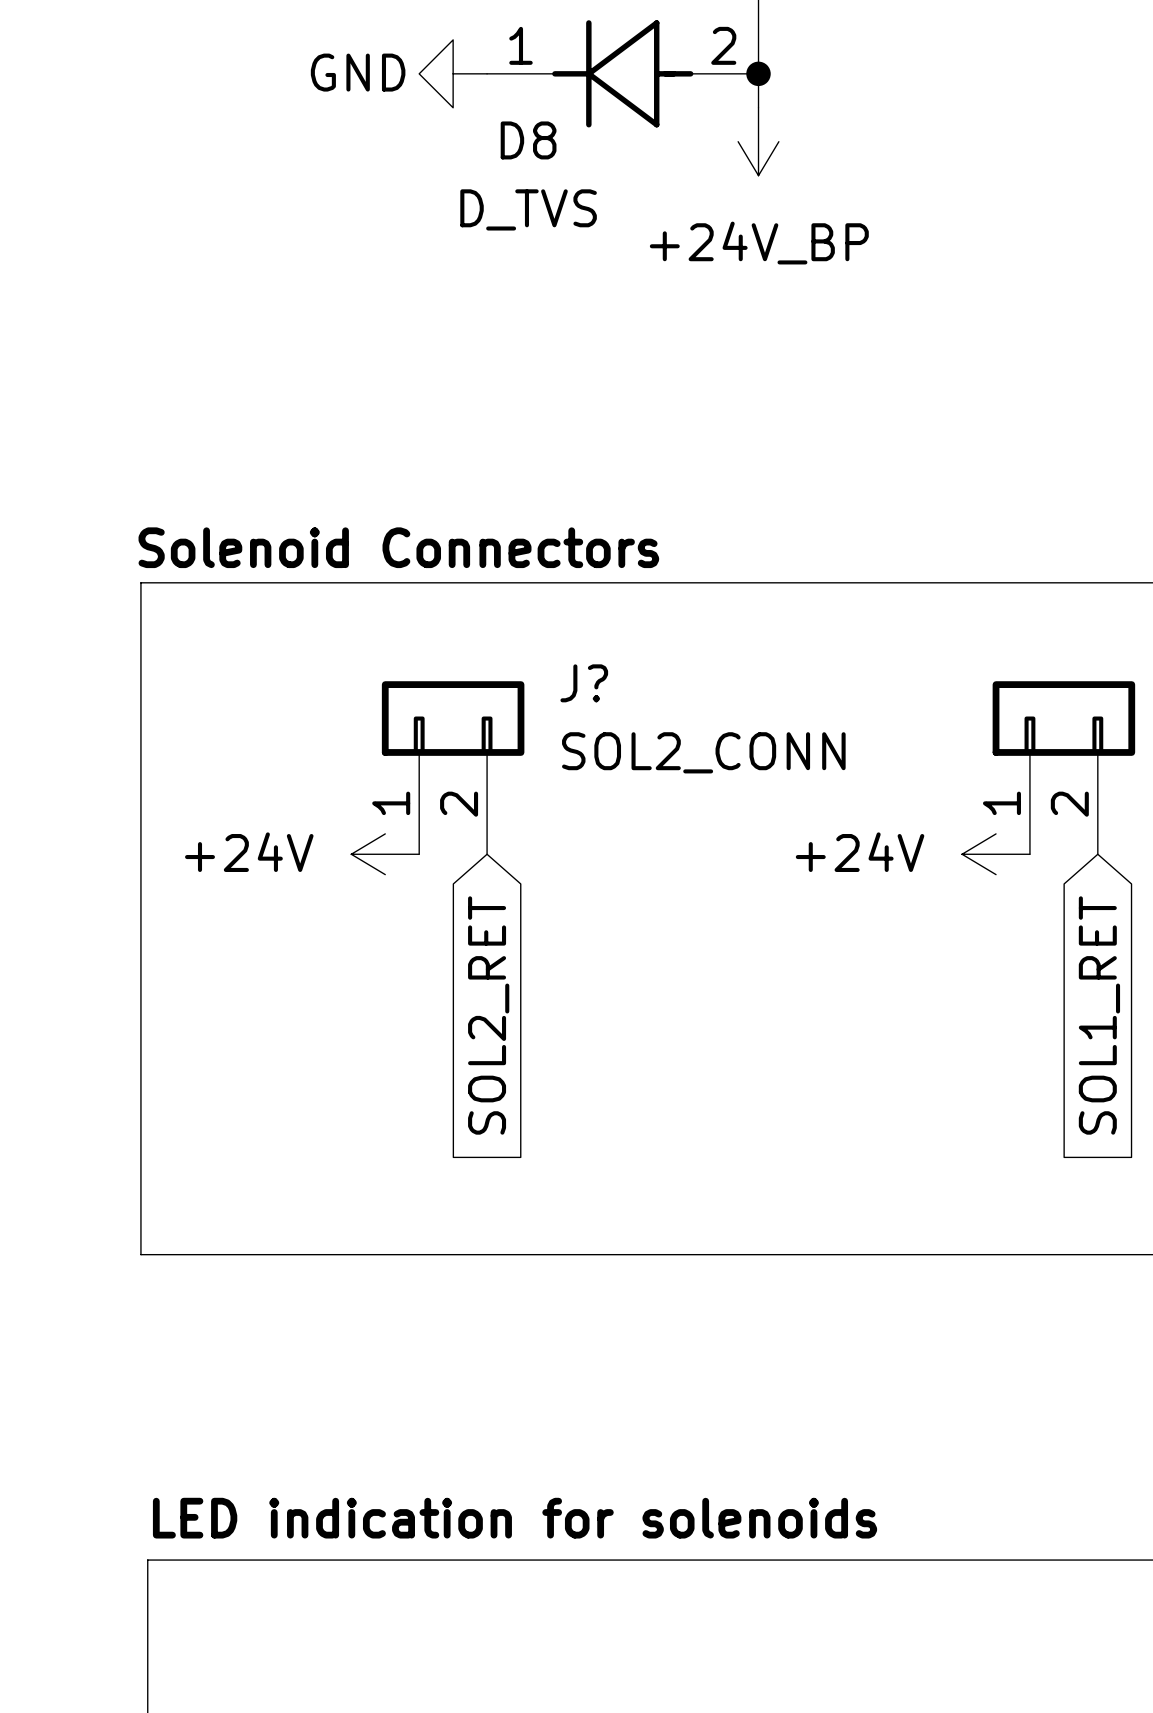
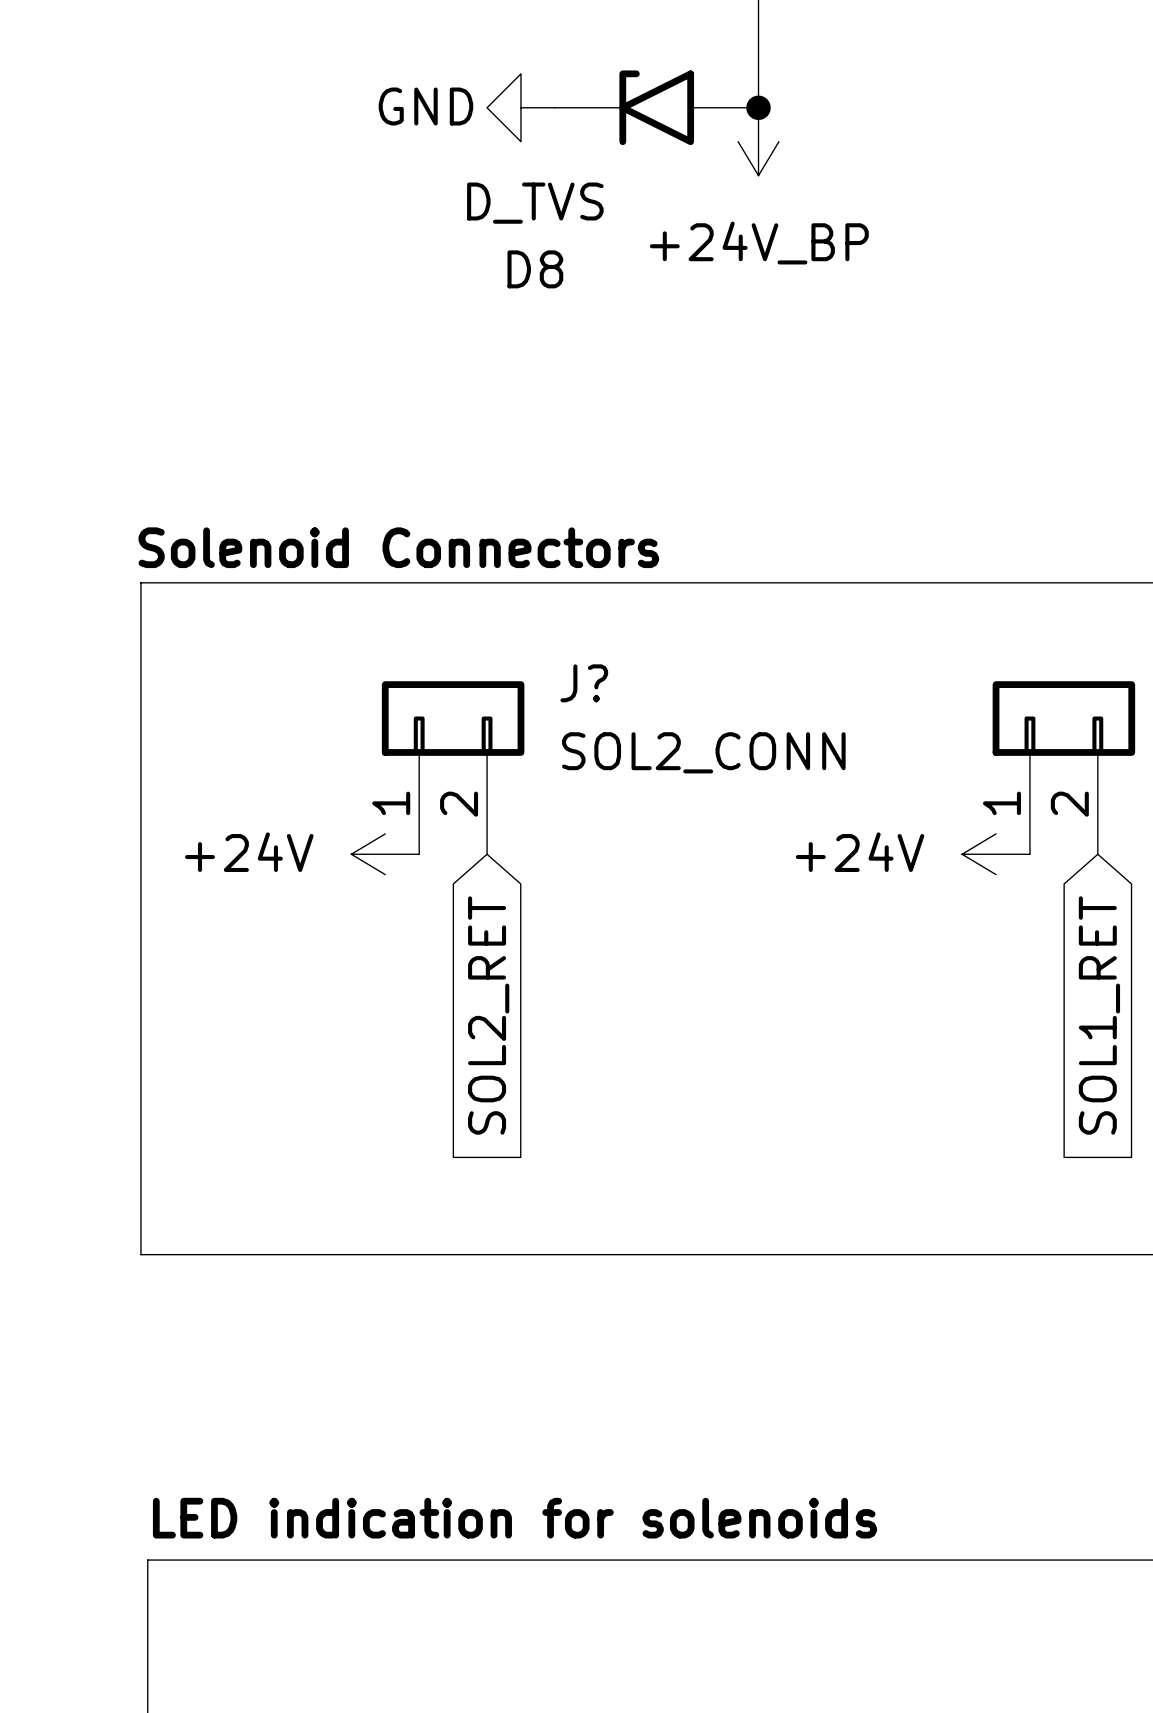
D8 symbol: [487, 20, 759, 128] -> [554, 70, 759, 146]
power symbol position: GND (453, 73) -> GND (520, 107)
junction position: (758, 73) -> (758, 107)
D8 name position: D8 (528, 140) -> D8 (535, 269)

